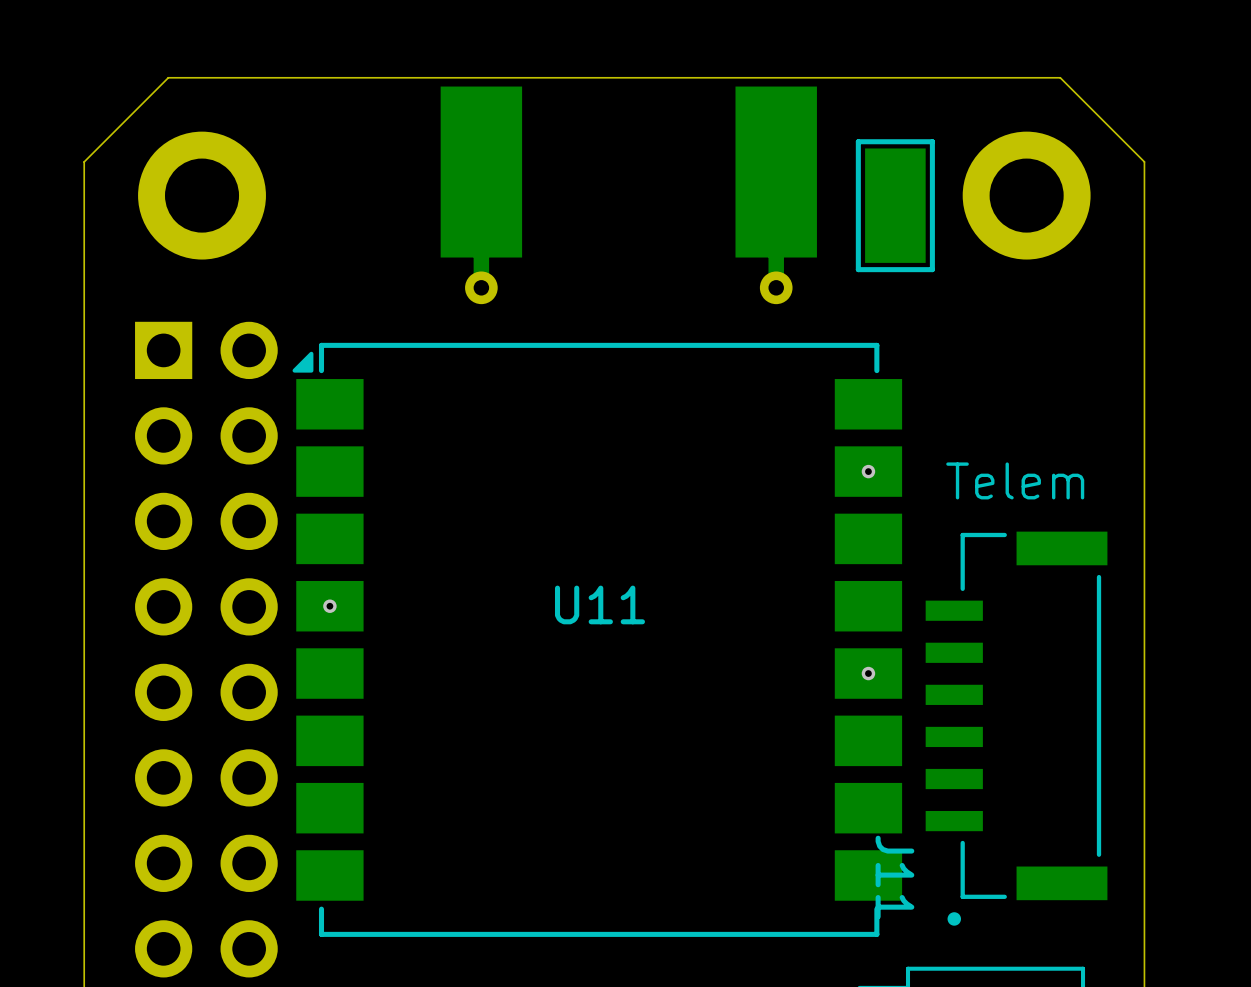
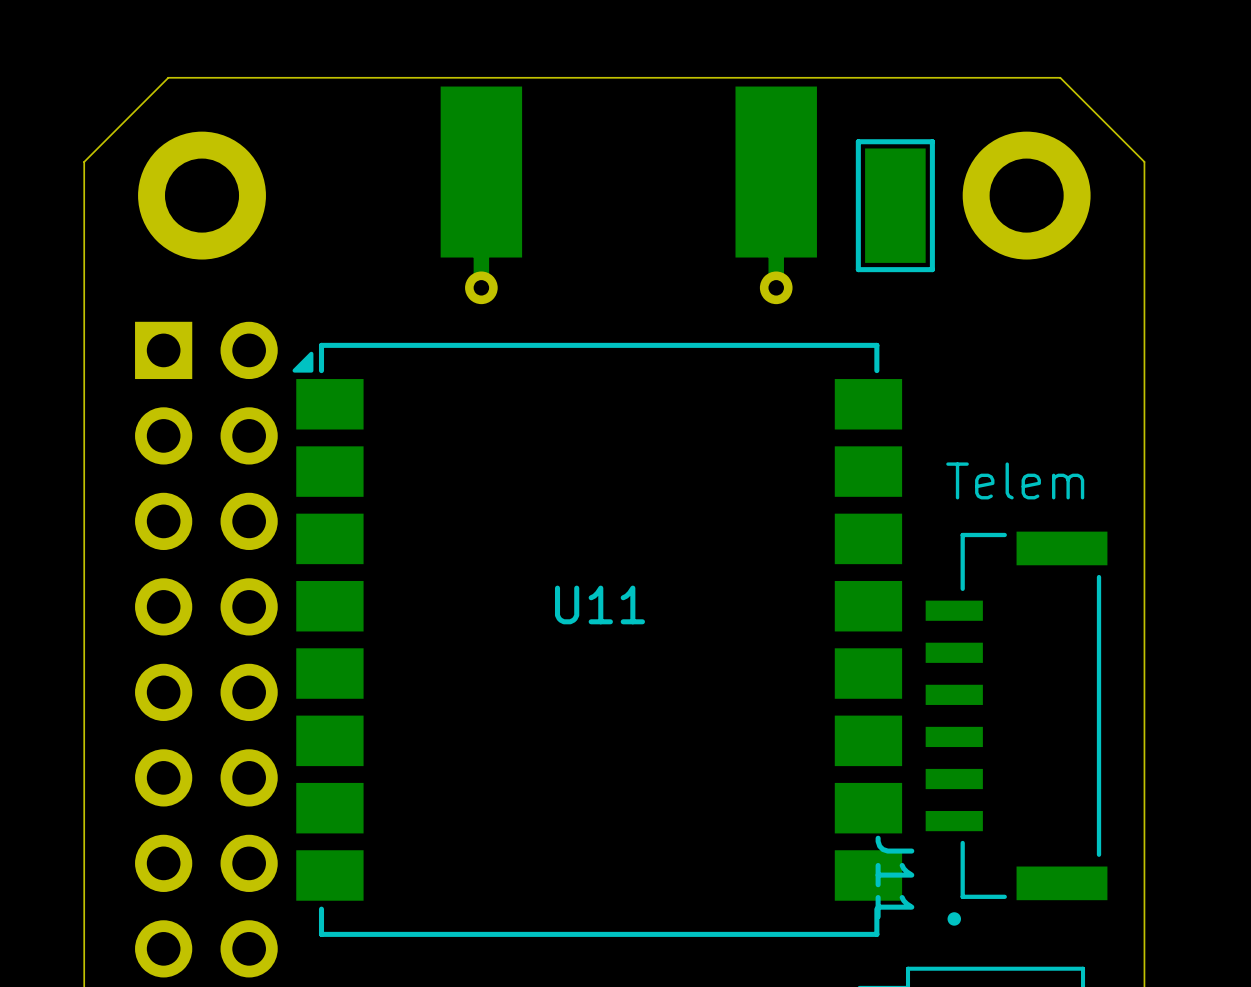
via: (868, 471) -> none
via: (329, 606) -> none
via: (868, 673) -> none

